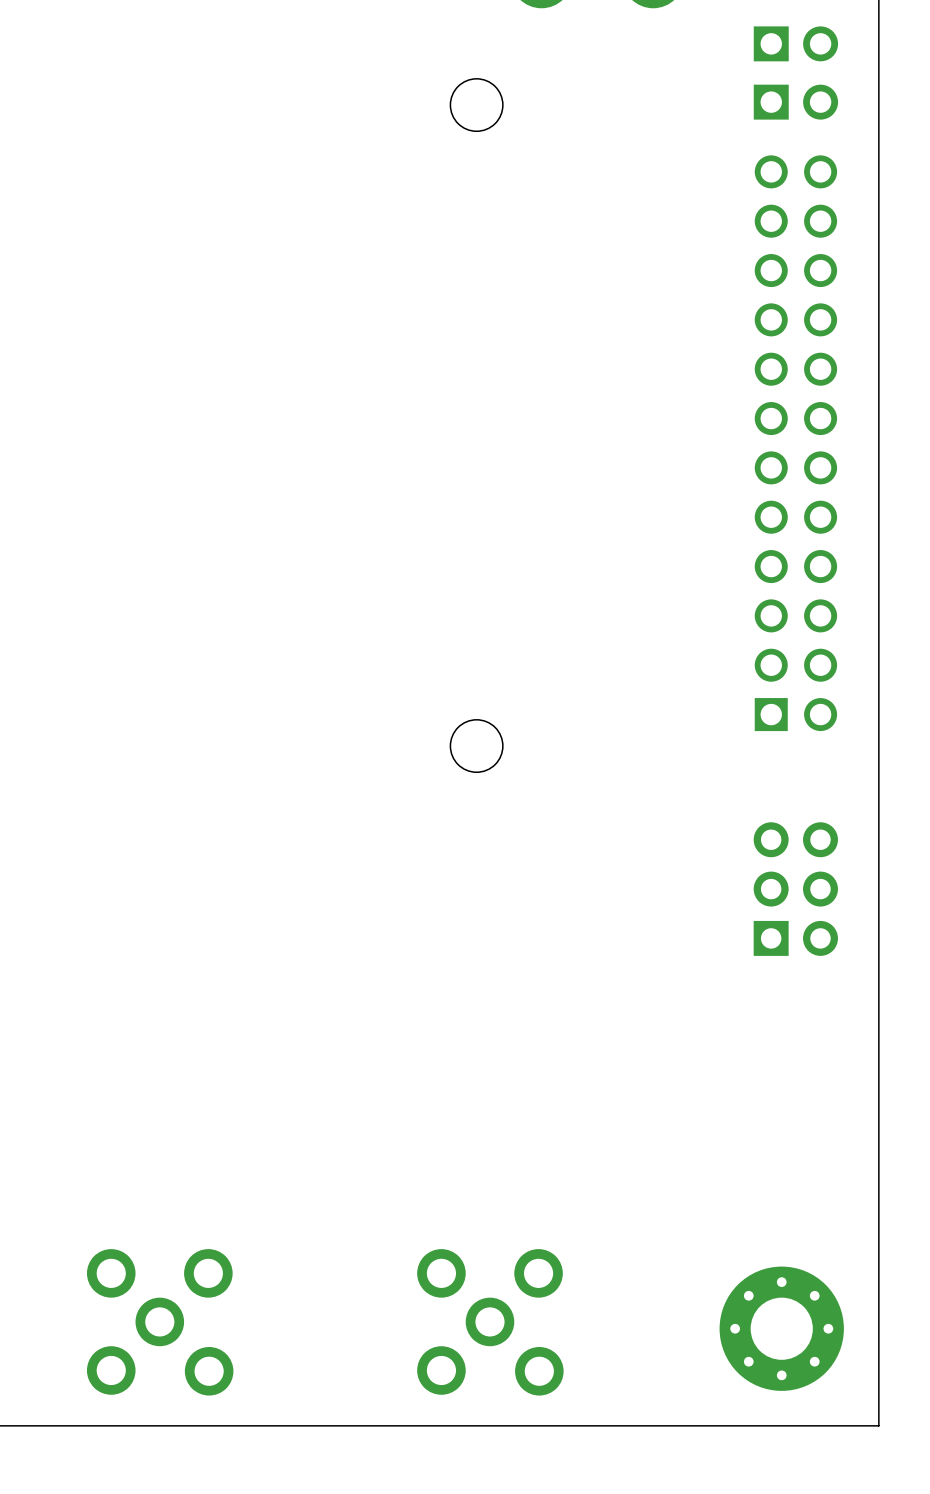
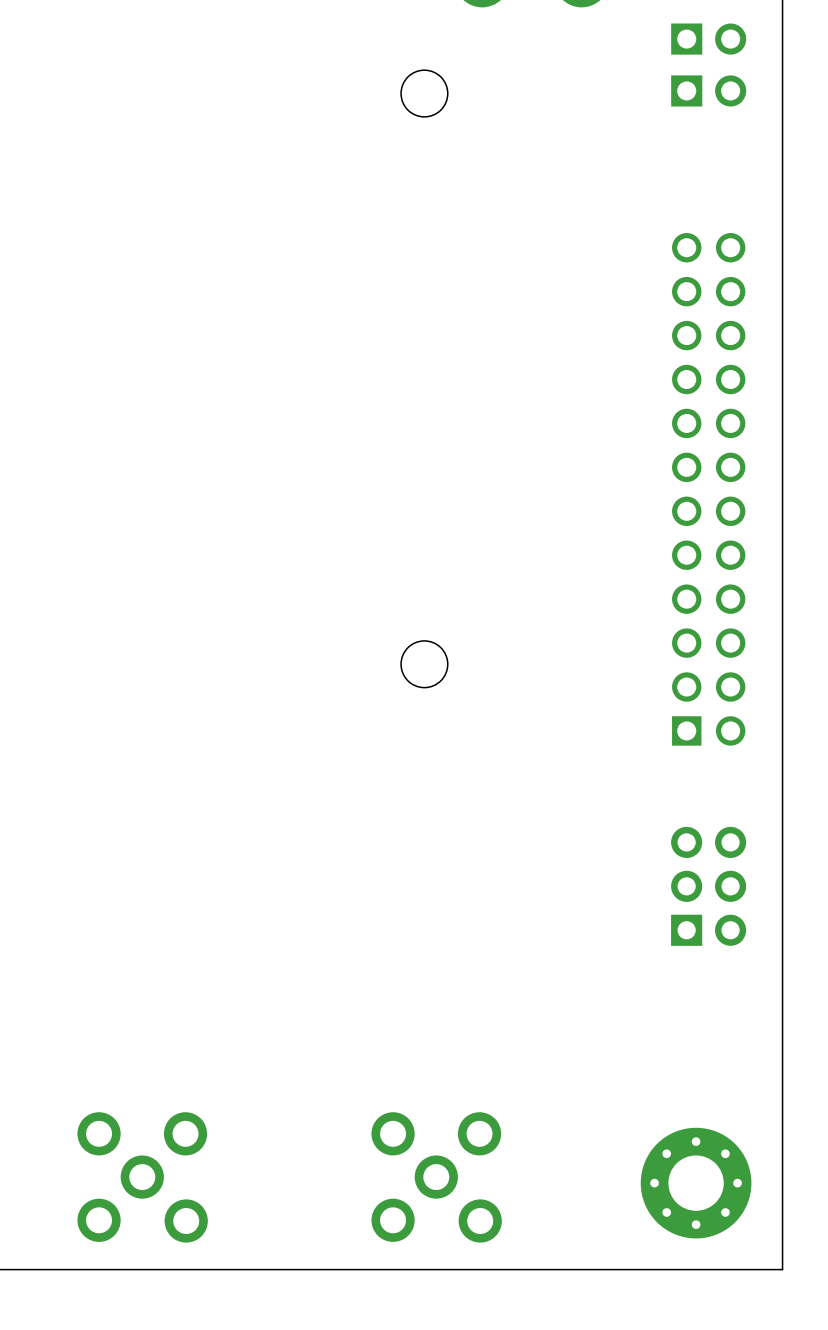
part position: (795, 443) -> (708, 489)
part position: (795, 889) -> (708, 886)

